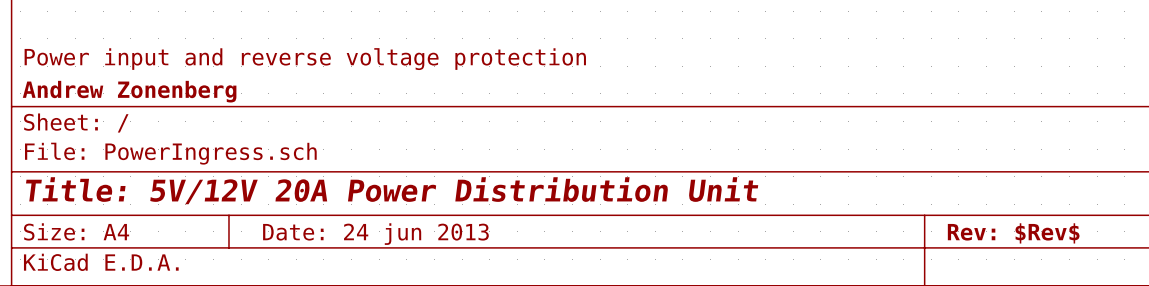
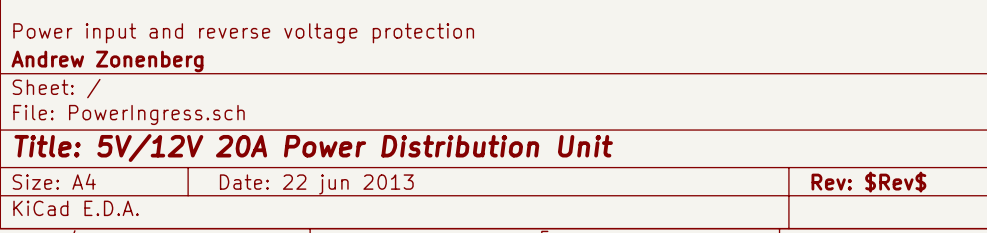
title block: Date: 24 jun 2013 (375, 234) -> Date: 22 jun 2013 (316, 184)

